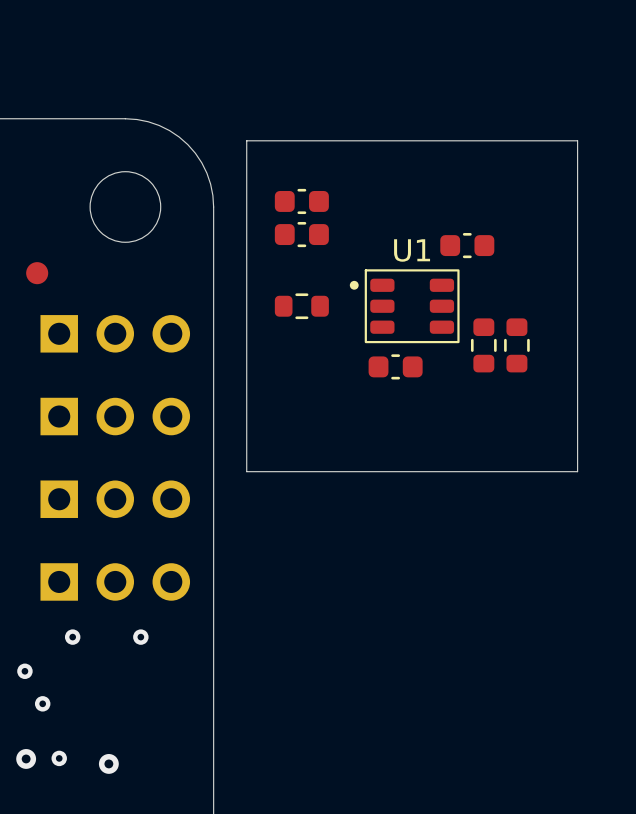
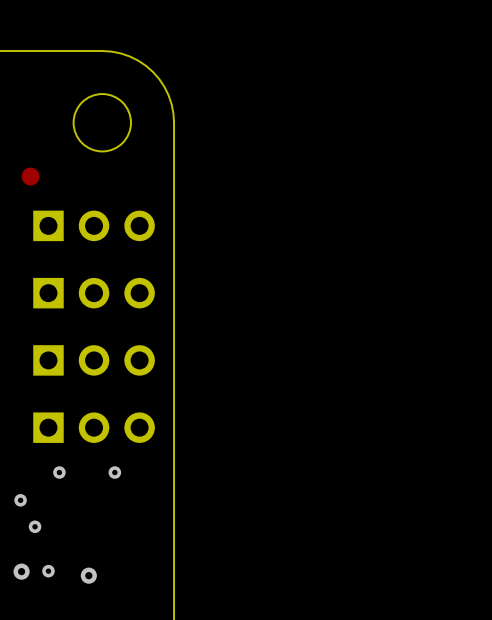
board edge: (246, 140) (577, 140) (577, 471) (246, 471) (246, 140) -> none
part: (301, 201) -> none
part: (301, 234) -> none
part: (467, 245) -> none
part: (301, 306) -> none
U1: (404, 306) -> none
part: (483, 345) -> none
part: (516, 345) -> none
part: (395, 366) -> none

